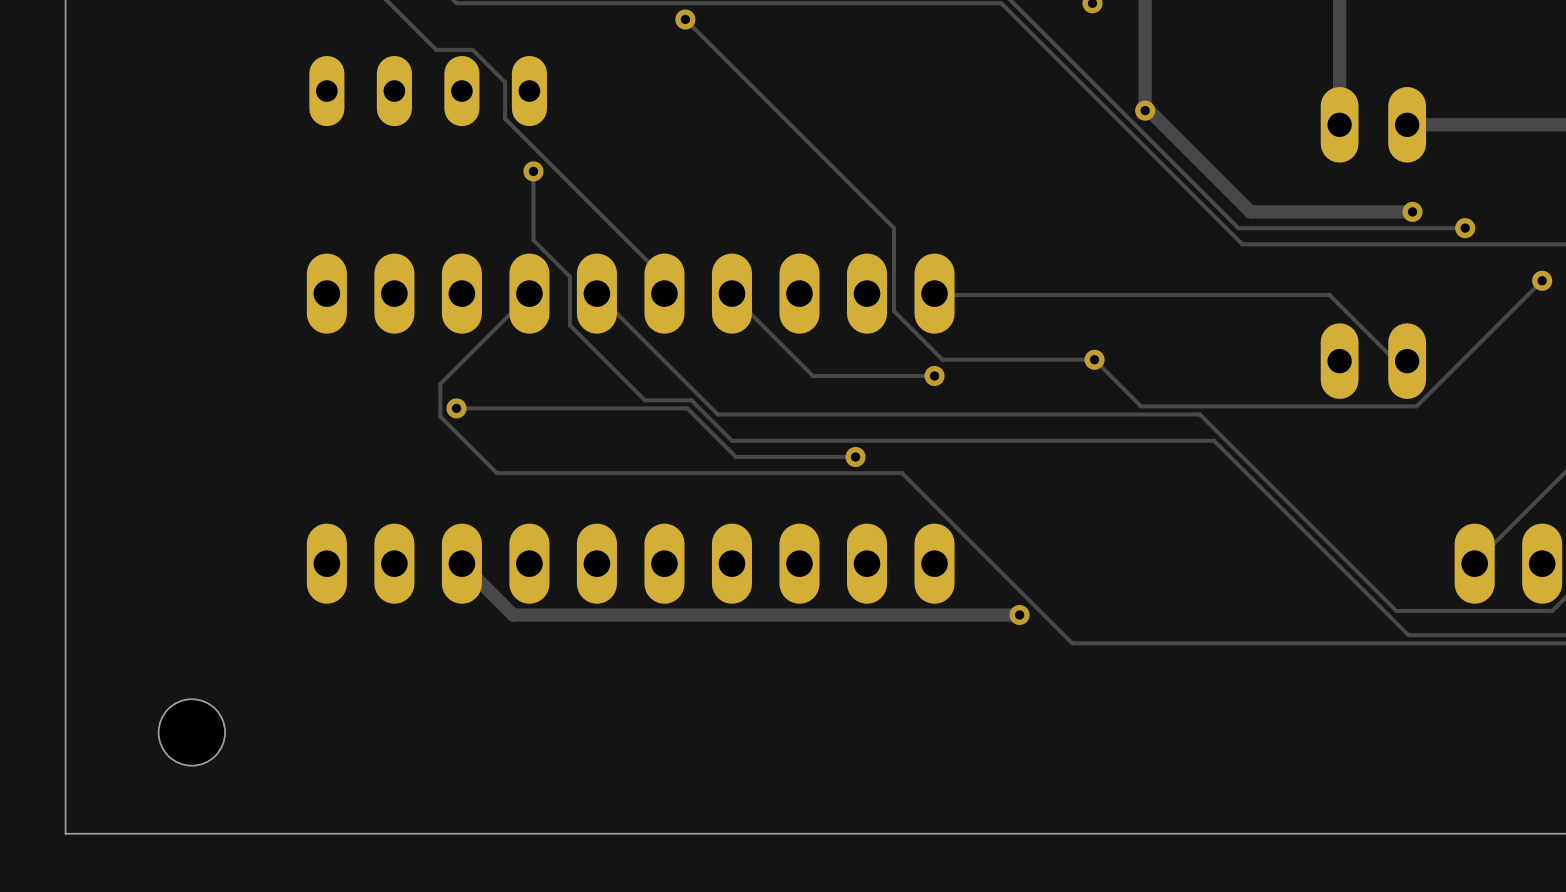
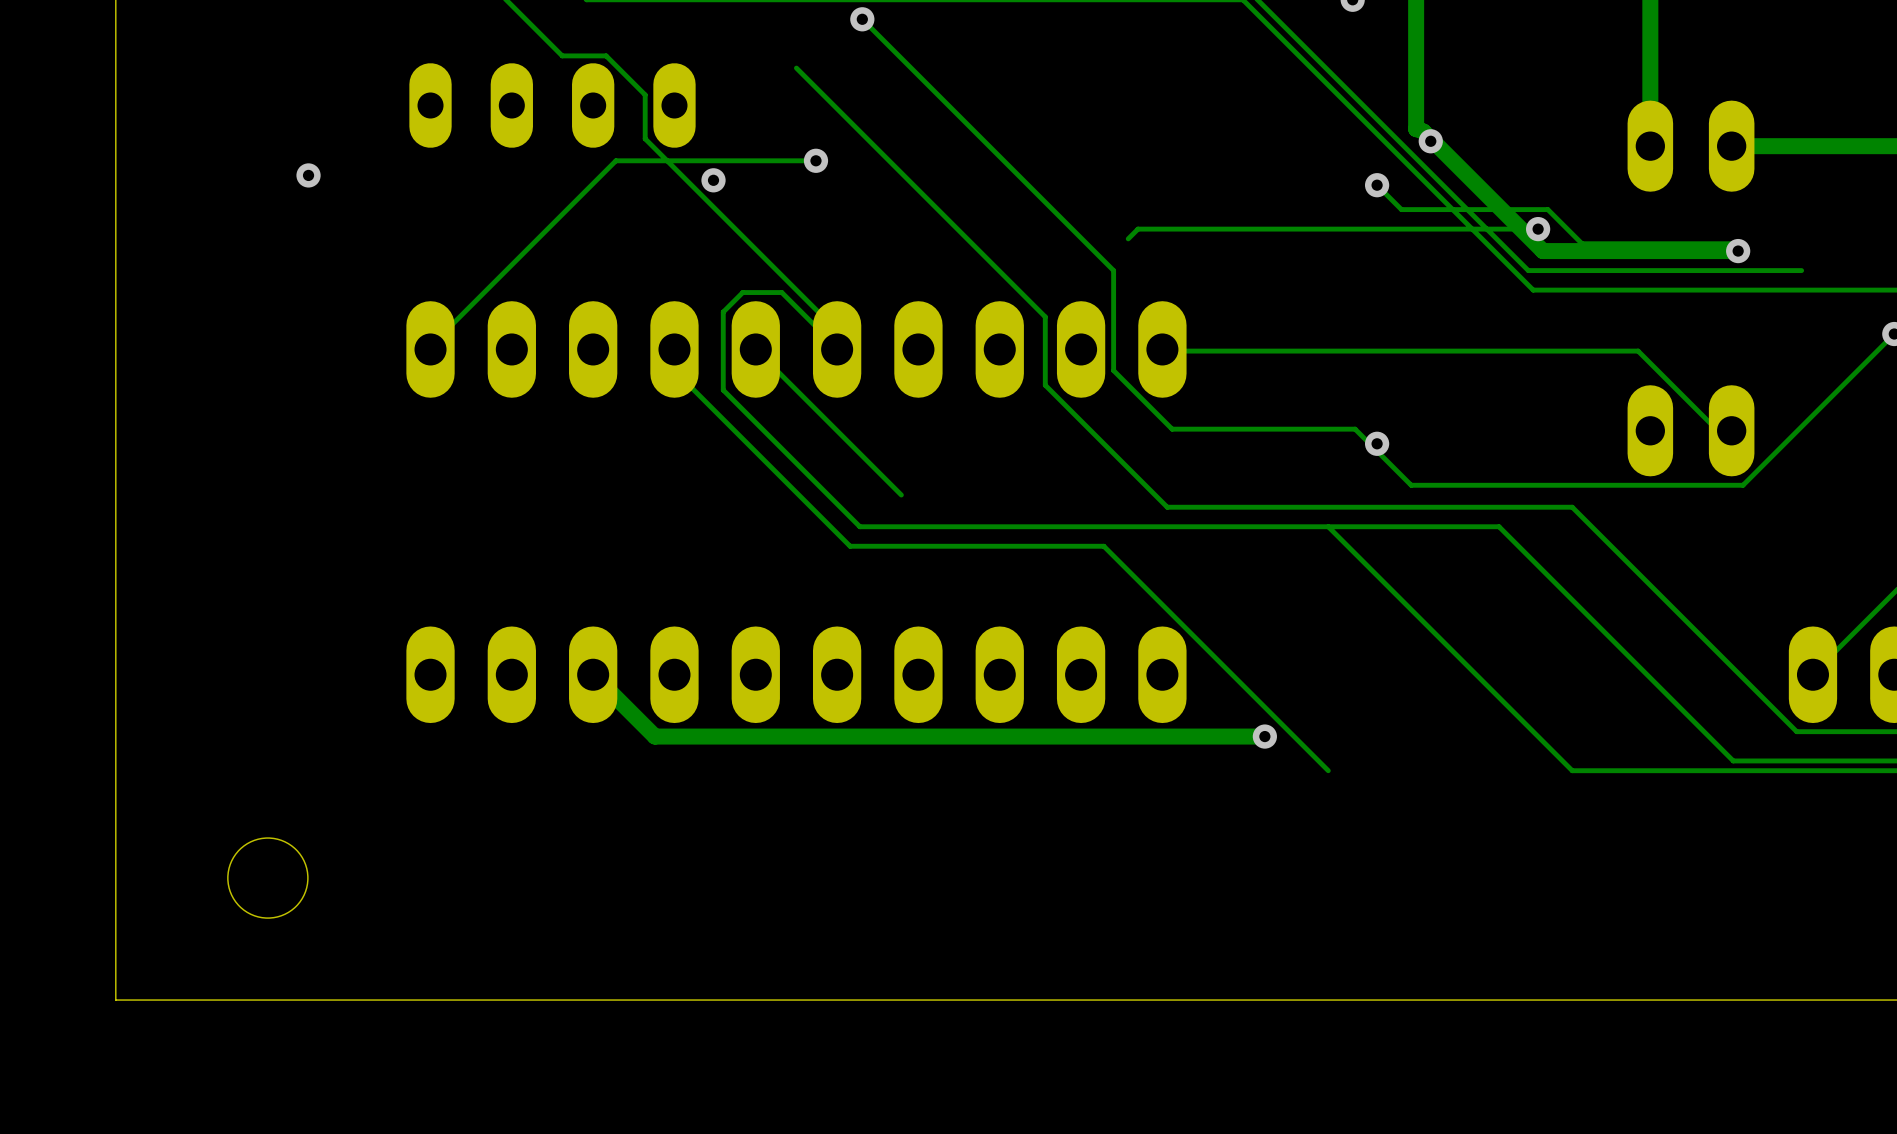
via position: (1145, 110) -> (1430, 141)
track: none -> (815, 160) (615, 160) (430, 346) (430, 349)
via: none -> (815, 160)
via: none -> (308, 175)
track: none -> (1377, 185) (1401, 209) (1547, 209) (1582, 243) (1738, 243)
via: none -> (1377, 185)
track: (533, 171) (533, 240) (569, 276) -> (837, 349) (781, 292) (742, 292) (723, 312) (723, 329)
via position: (533, 171) -> (713, 180)
track: none -> (1538, 229) (1138, 229) (1128, 238)
via: none -> (1538, 229)
via: (1465, 228) -> none
track: (731, 293) (812, 375) (934, 375) -> none
track: (529, 294) (440, 384) (440, 416) (497, 473) (902, 473) -> (1067, 546) (1103, 546) (1123, 565)
track: (569, 325) (644, 400) (691, 400) (731, 440) -> (723, 387) (723, 390) (859, 526) (918, 526)
via position: (1094, 359) -> (1377, 443)
via: (934, 375) -> none
track: (456, 408) (687, 408) (736, 456) -> (674, 351) (674, 370) (850, 546) (923, 546)
via: (456, 408) -> none
track: (717, 414) (1199, 414) (1396, 610) (1461, 610) -> (796, 68) (1045, 316) (1045, 385) (1167, 507) (1572, 507) (1796, 731)
via: (855, 456) -> none
track: (1274, 643) (1072, 643) -> (1572, 770) (1328, 526)

